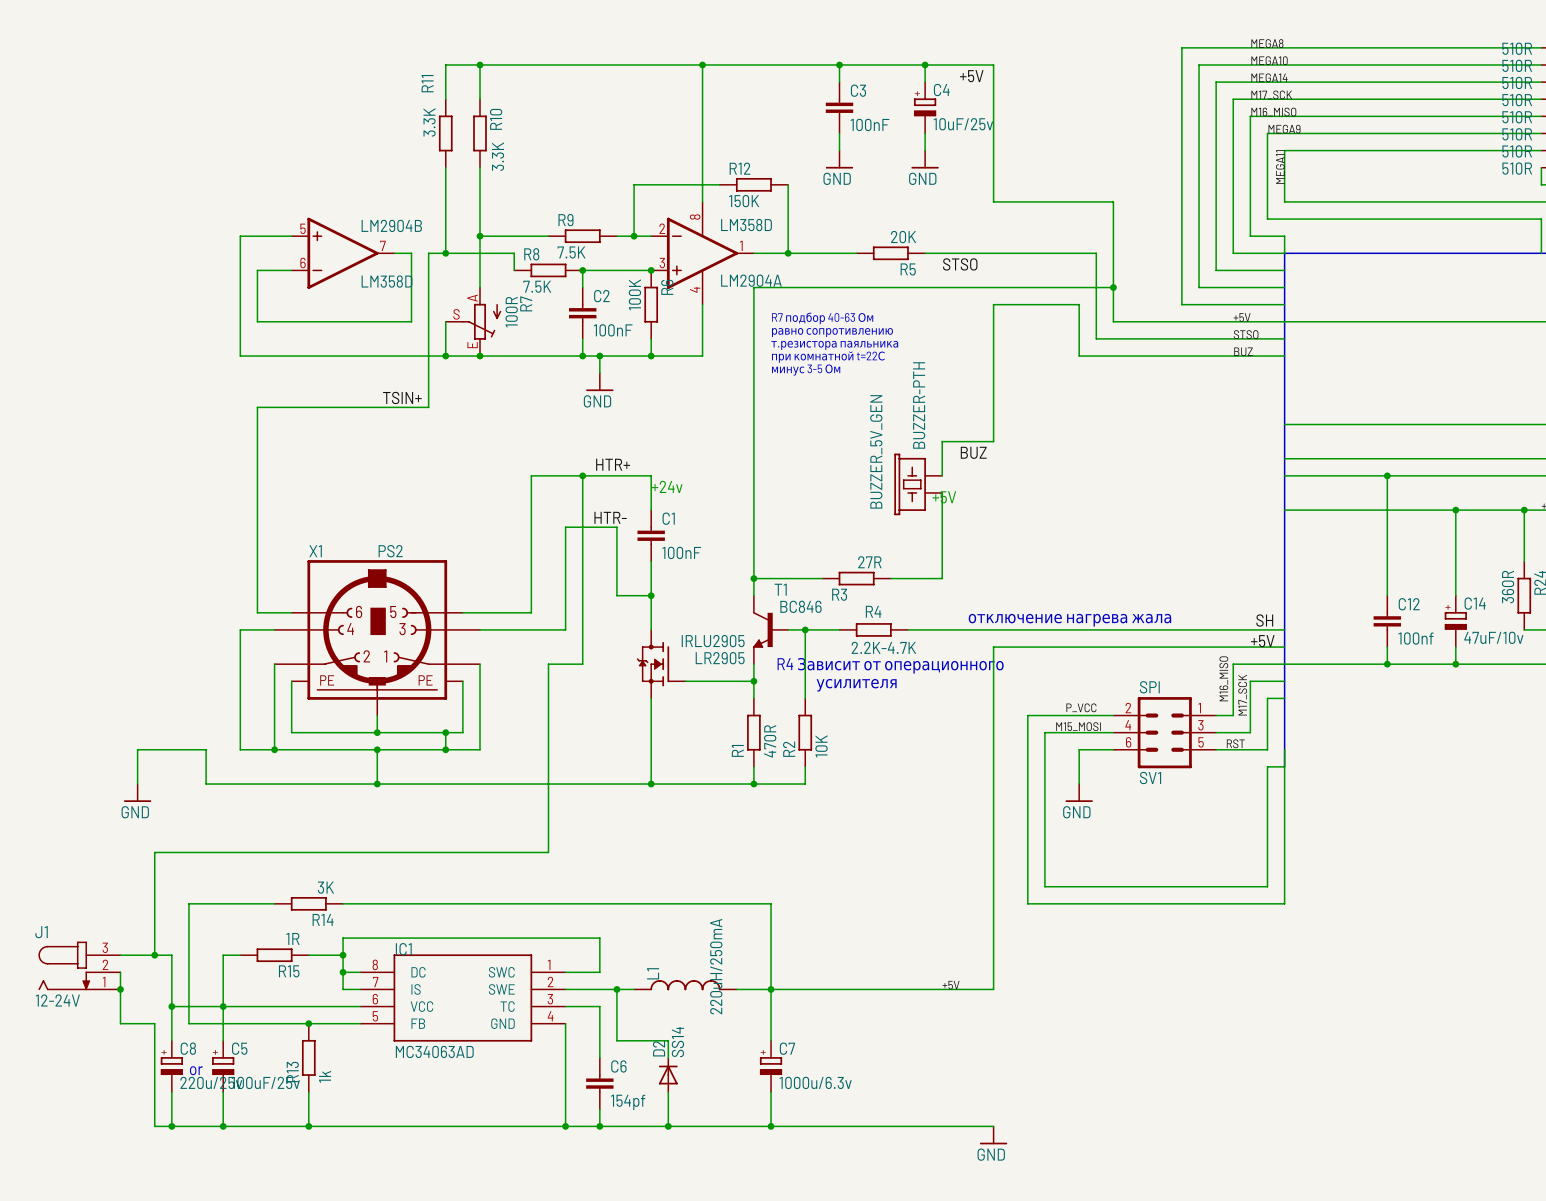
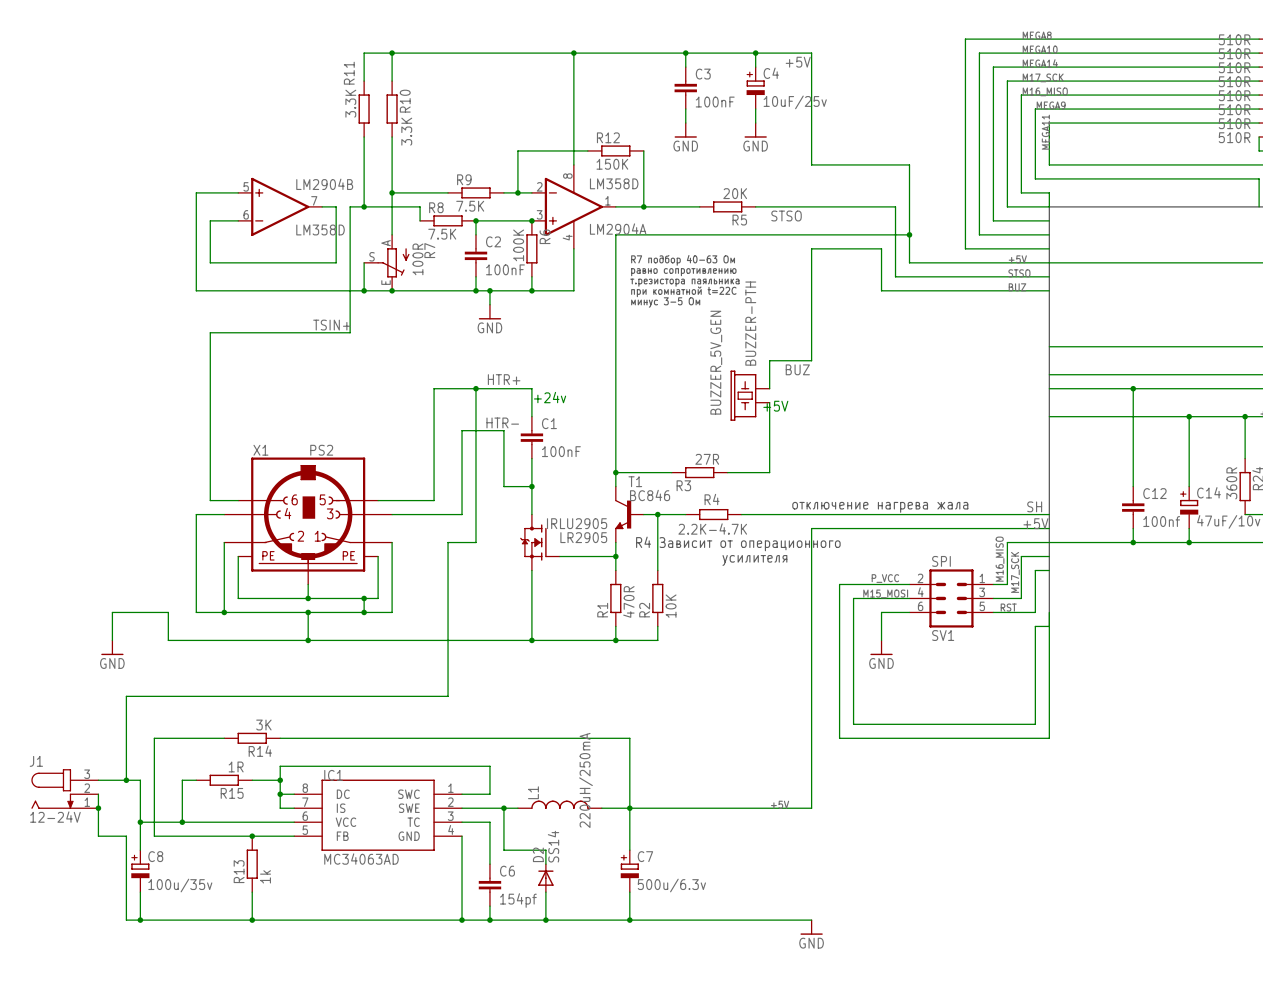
wire: (223, 1006) (223, 1040) -> none
C5: 100uF/25v (223, 1066) -> none
text: or (196, 1070) -> none
C8 value: 220u/25v (211, 1082) -> 100u/35v (180, 885)
C7 value: 1000u/6.3v (815, 1082) -> 500u/6.3v (671, 885)
wire: (223, 1092) (223, 1126) -> none
junction: (223, 1126) -> none

